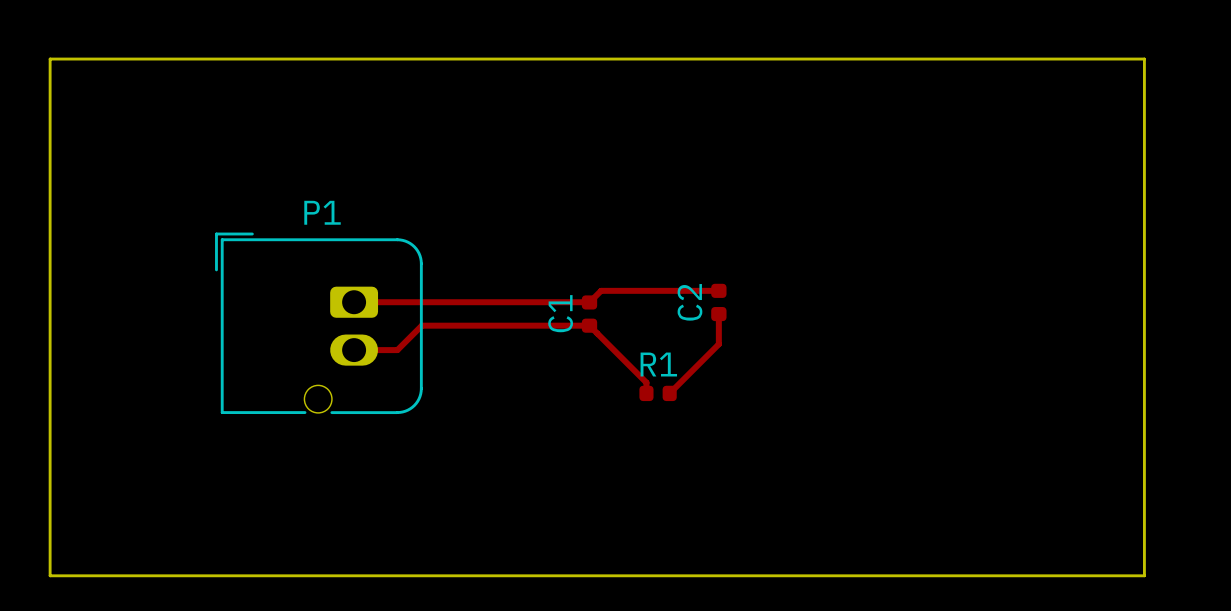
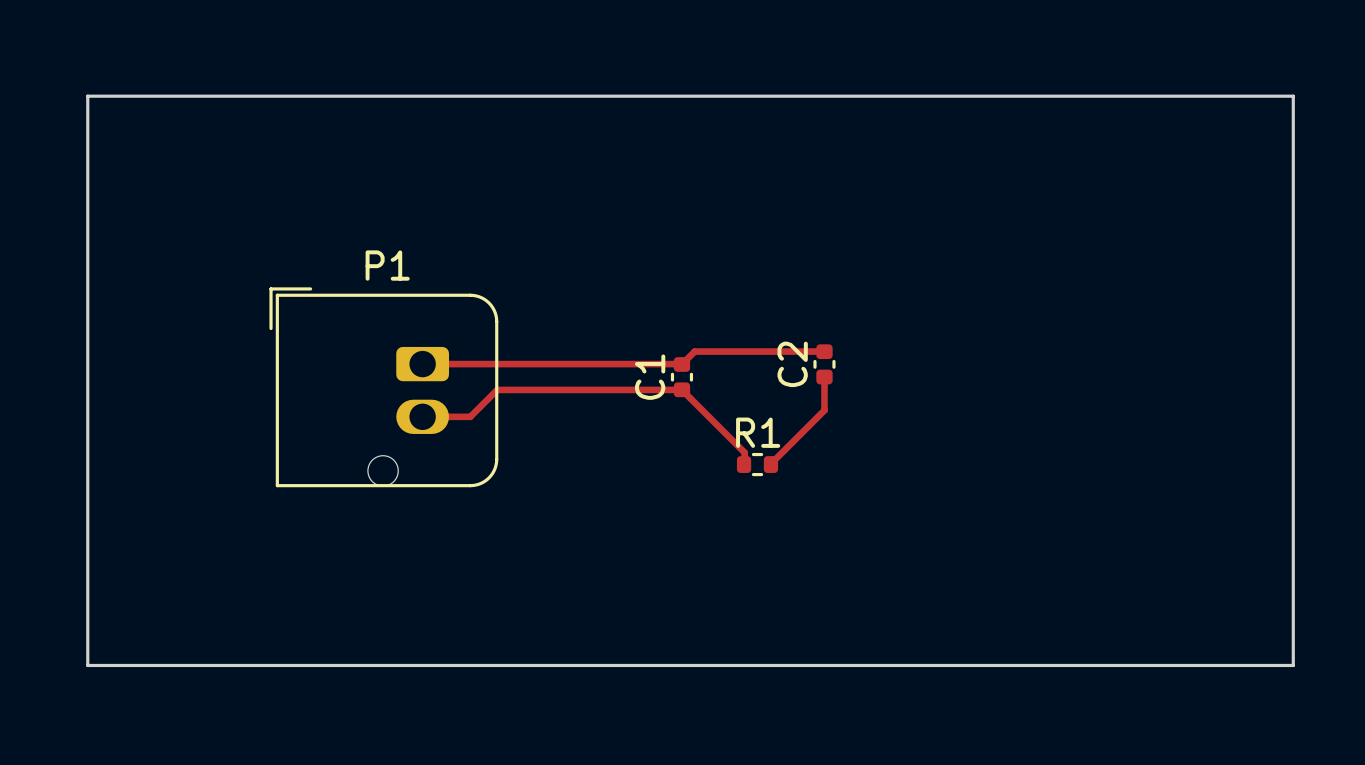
P1 footprint: [215, 232, 423, 415] -> [269, 287, 499, 488]
C2 footprint: [711, 283, 727, 322] -> [813, 344, 836, 385]
C1 footprint: [581, 295, 598, 333] -> [670, 357, 694, 398]
R1 footprint: [639, 385, 677, 402] -> [736, 452, 779, 477]

